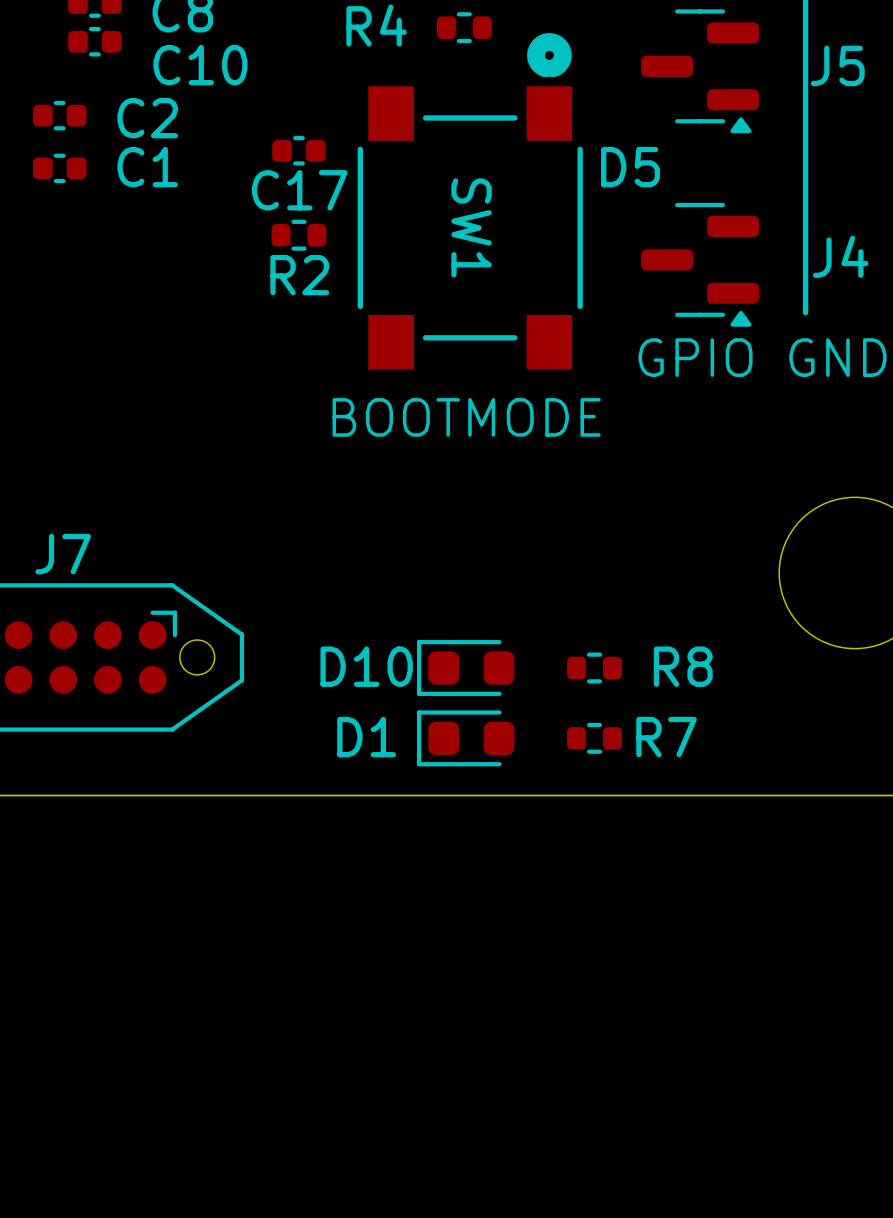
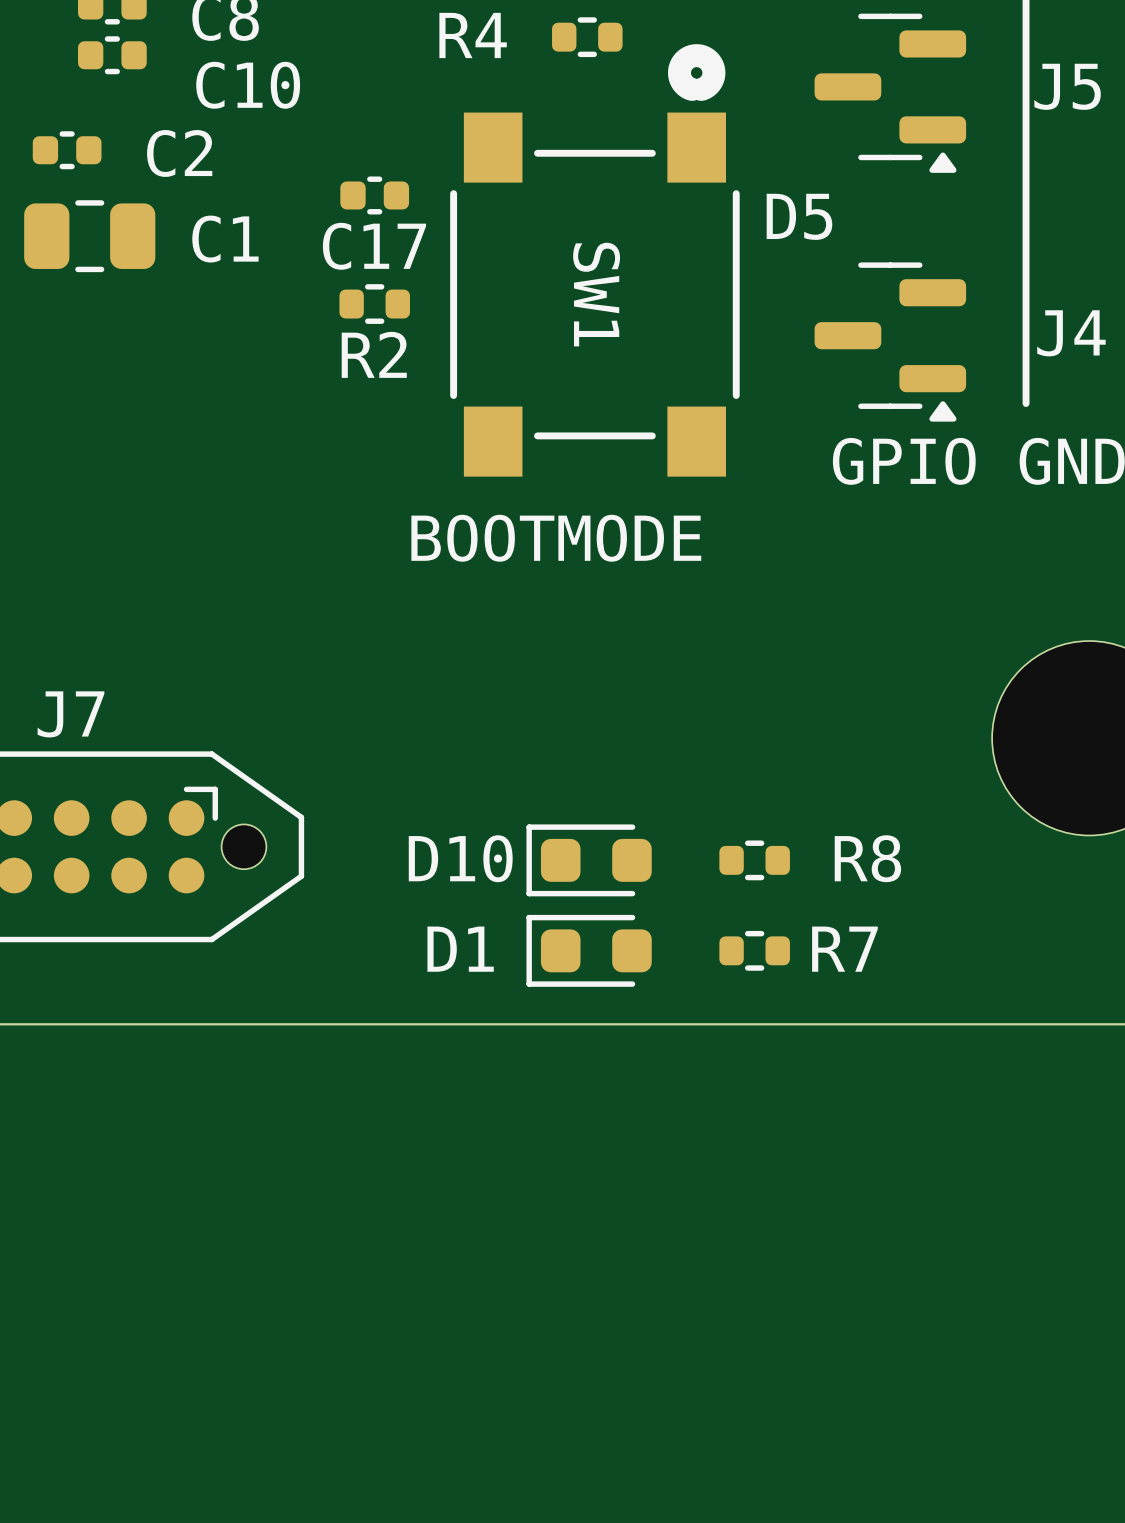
C1 footprint: [32, 153, 87, 184] -> [24, 200, 156, 273]

